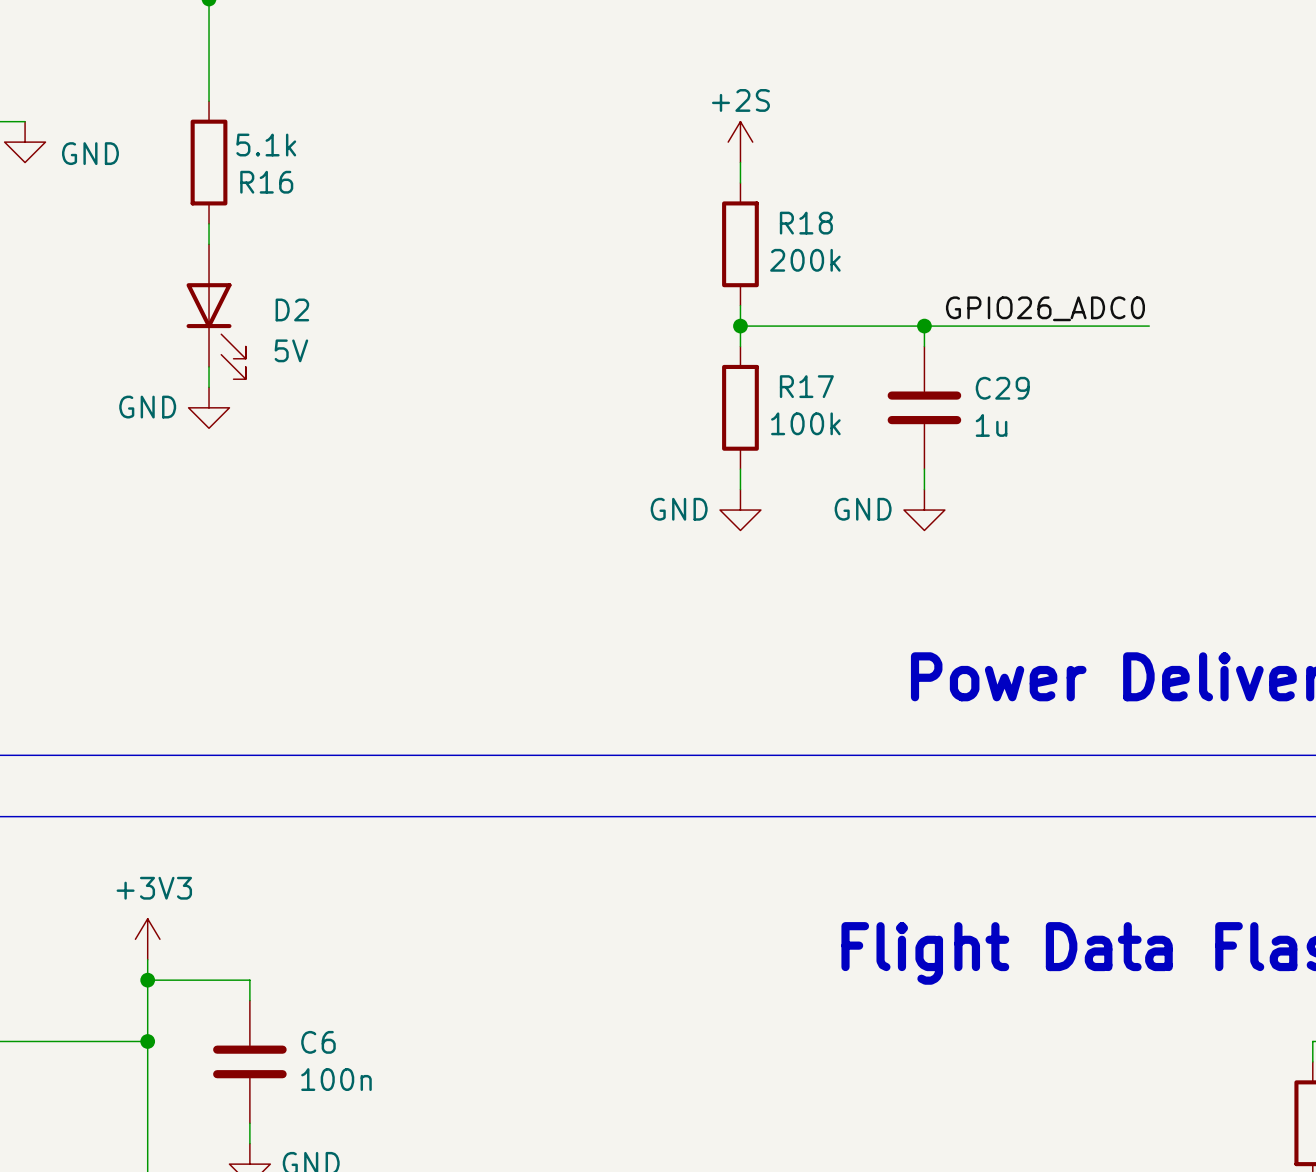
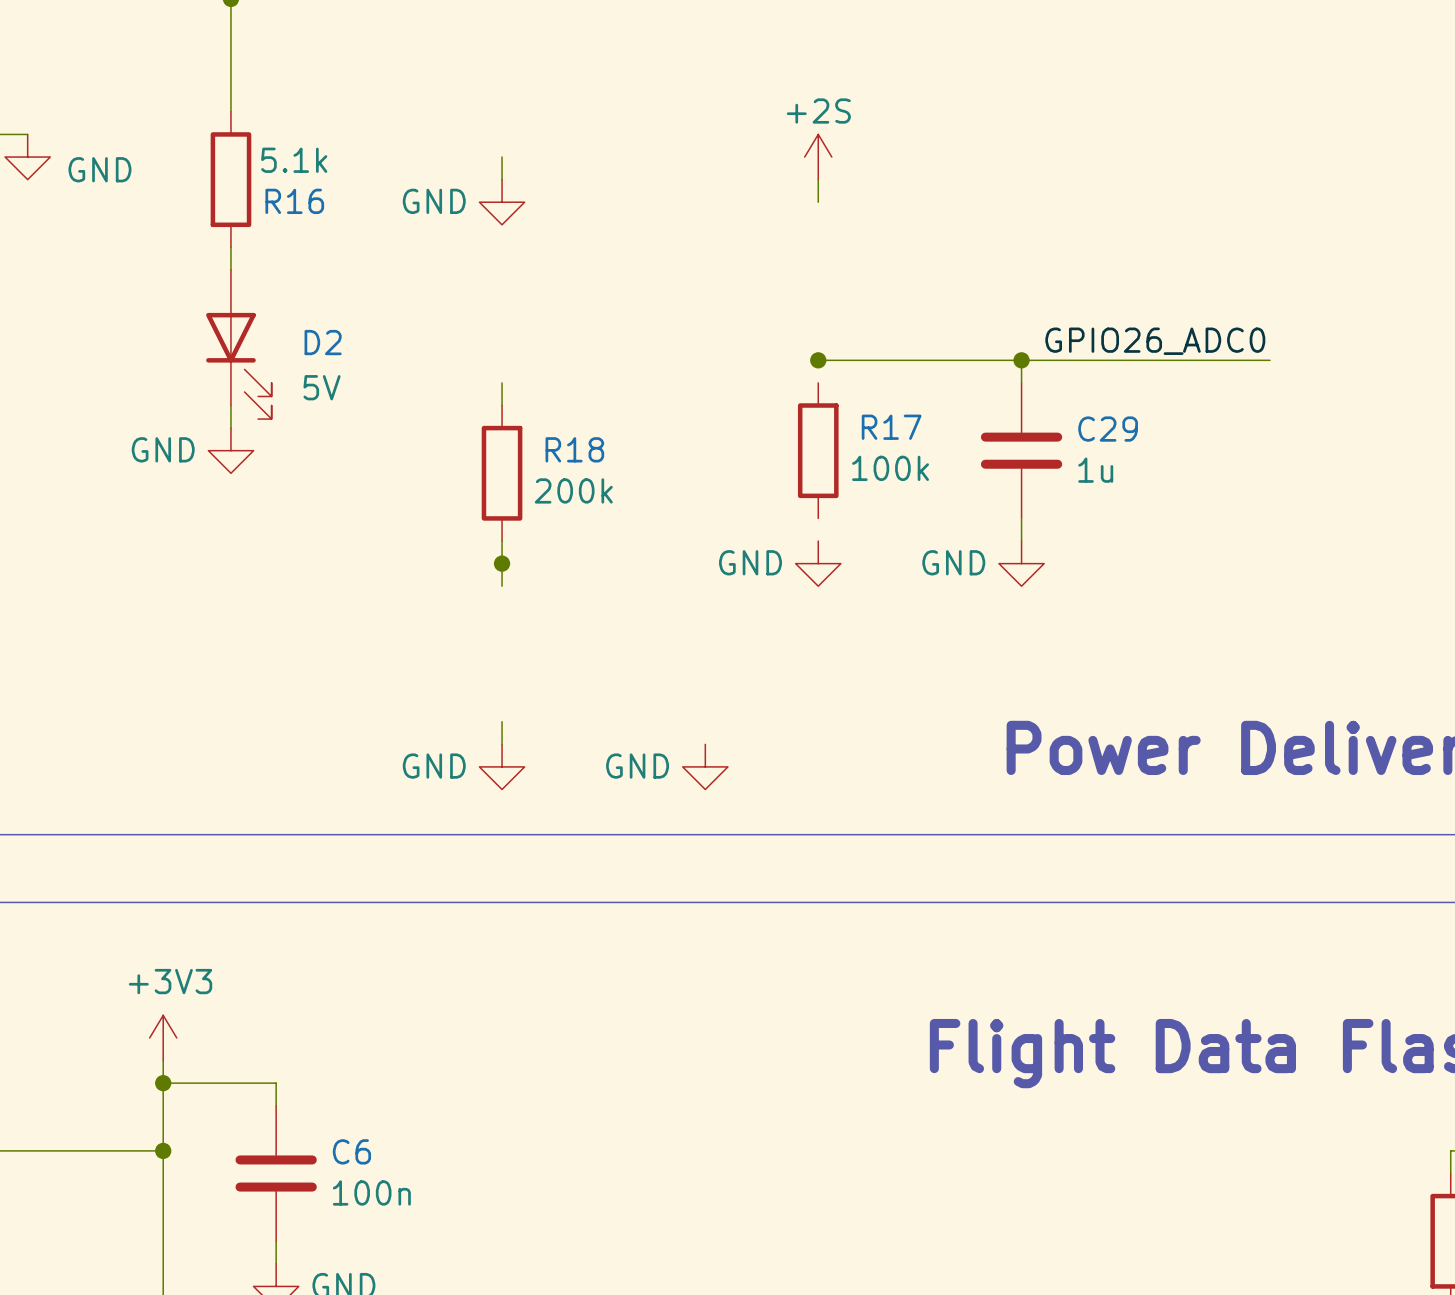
wire: none -> (502, 157) (502, 179)
power symbol: none -> GND (502, 202)
R18 position: (740, 244) -> (502, 473)
wire: (740, 305) (740, 346) -> (502, 541) (502, 586)
wire: none -> (502, 382) (502, 405)
wire: (740, 469) (740, 489) -> (502, 721) (502, 744)
junction: none -> (502, 563)
power symbol: none -> GND (502, 766)
power symbol: none -> GND (705, 766)

